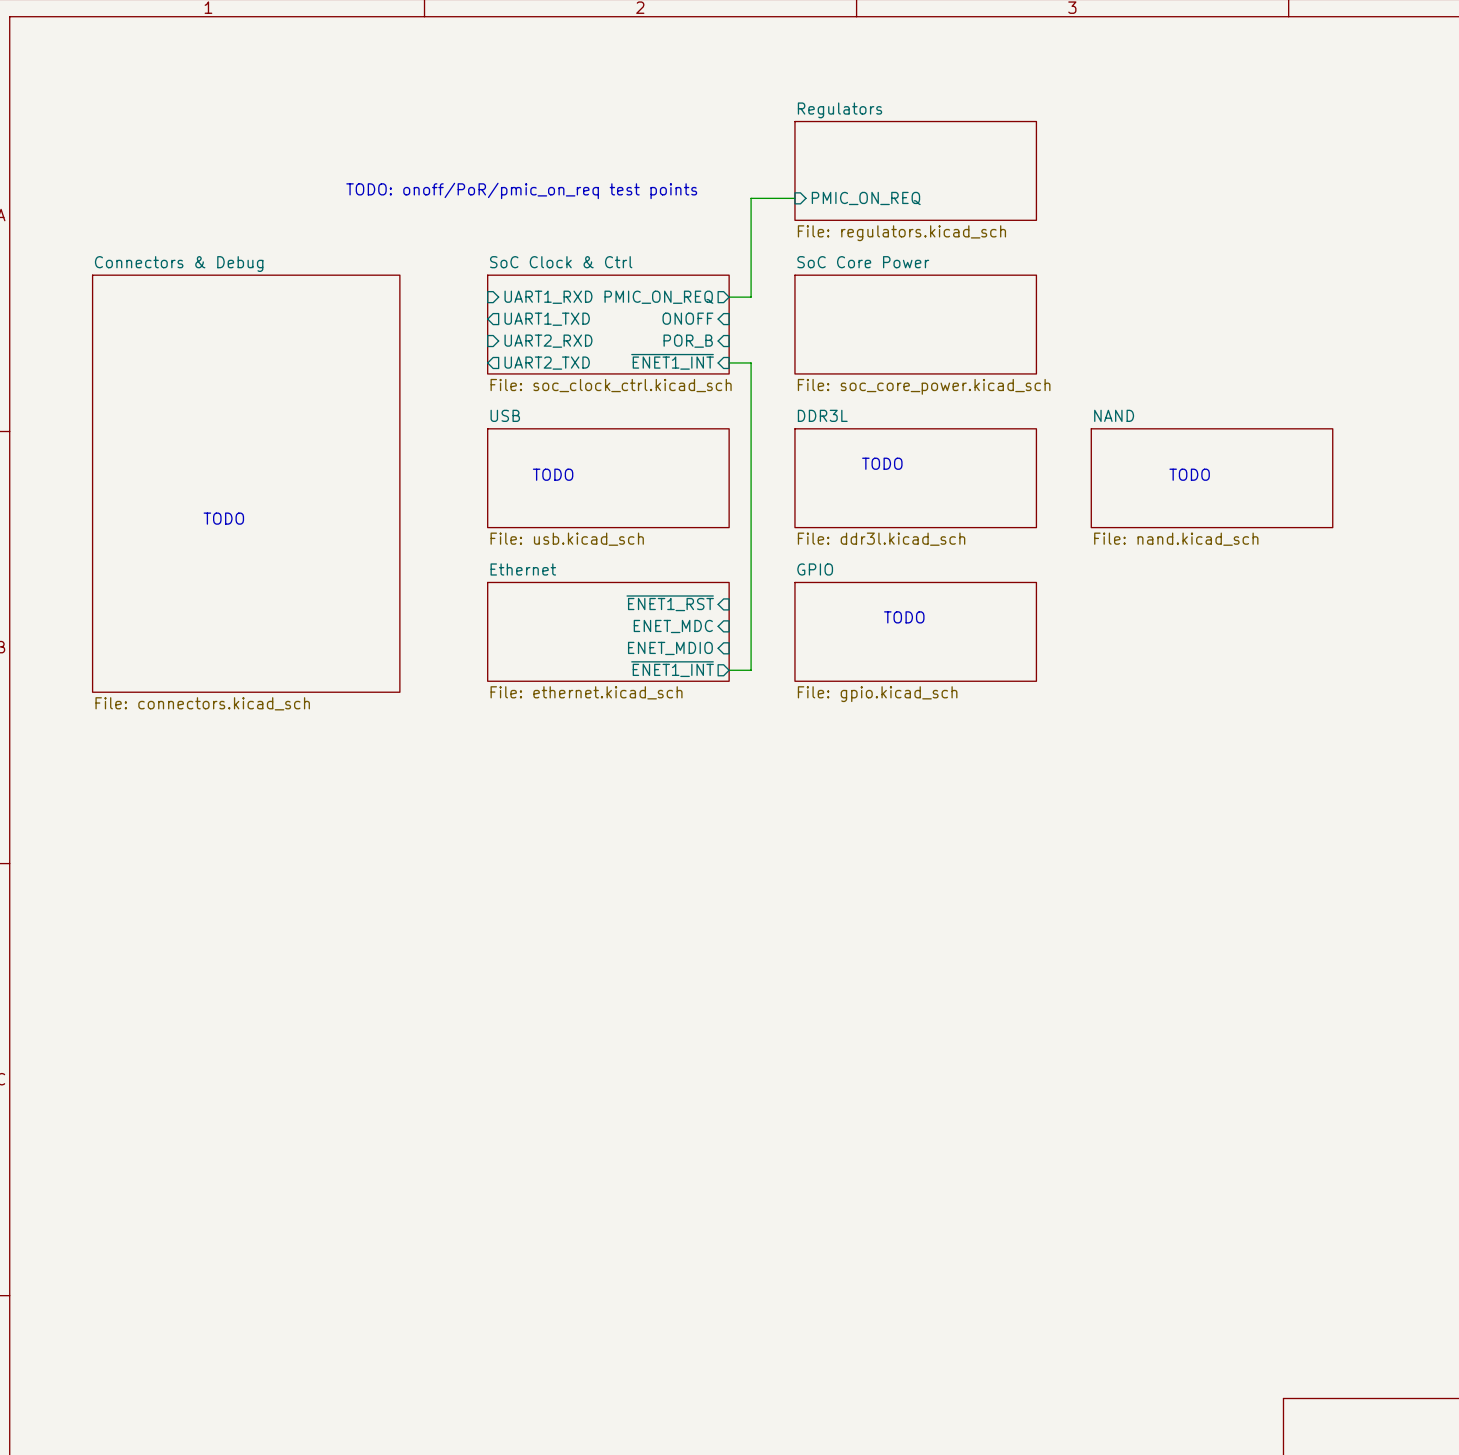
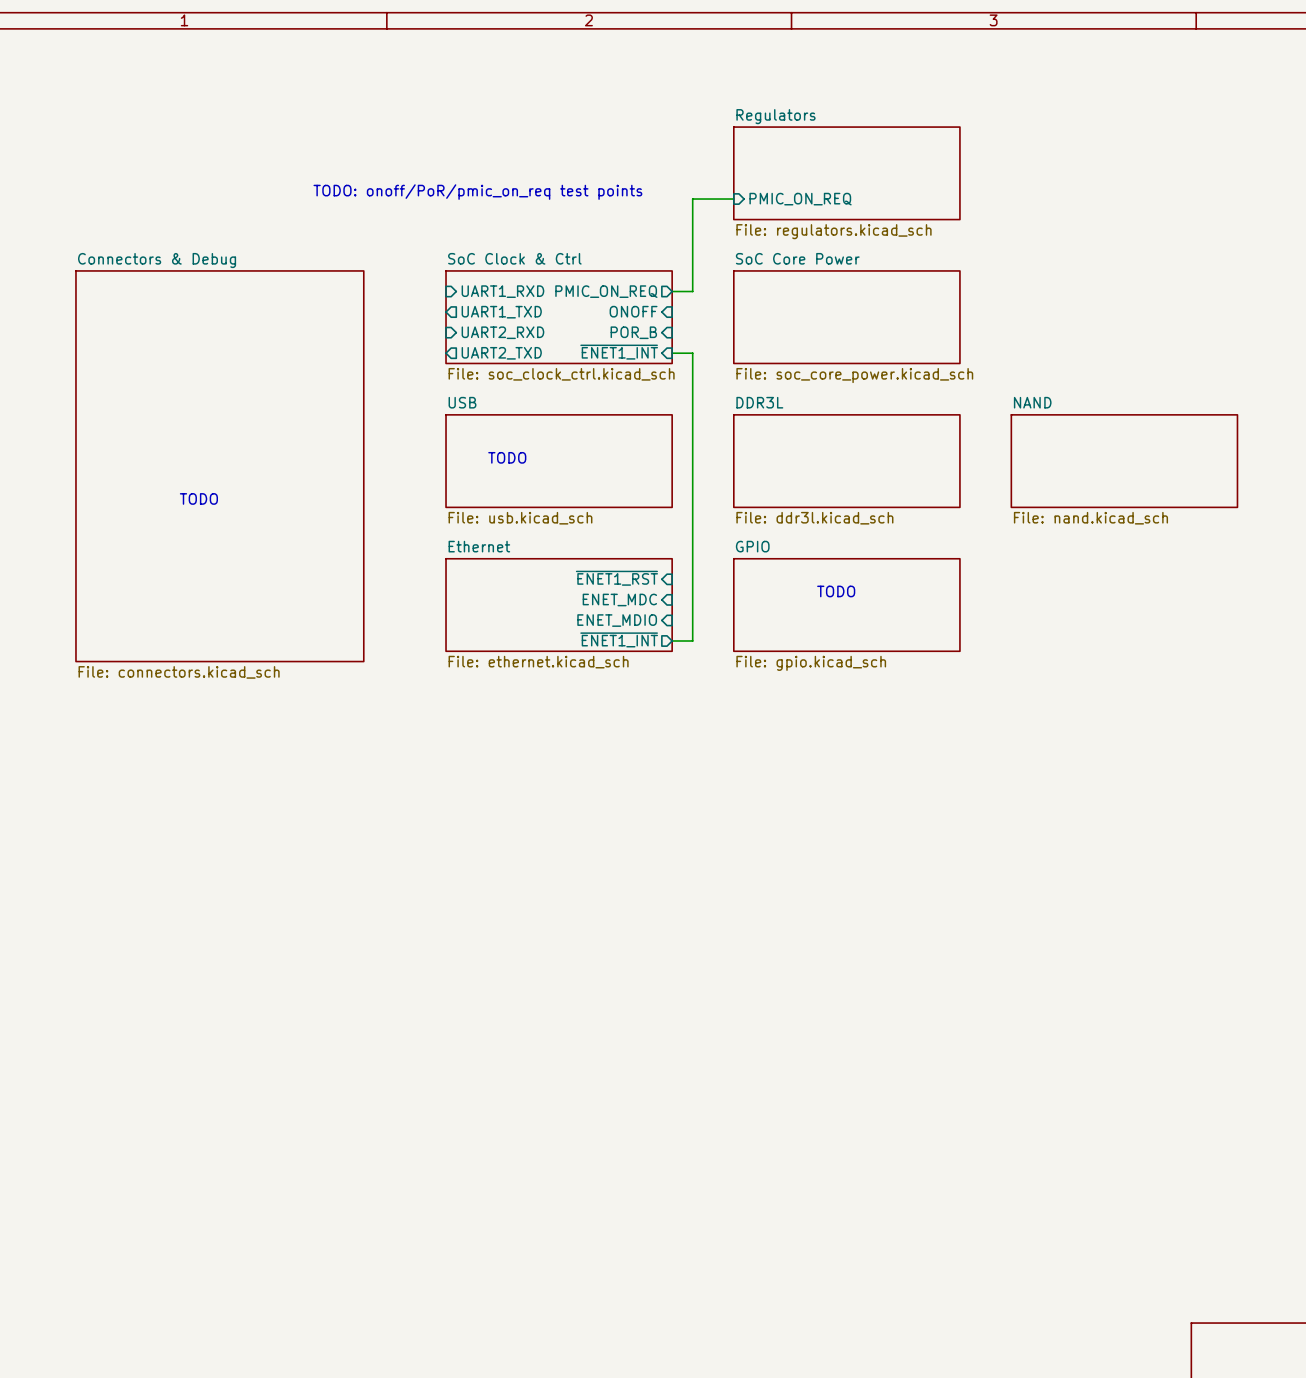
text: TODO (882, 463) -> none
text: TODO (1189, 474) -> none

